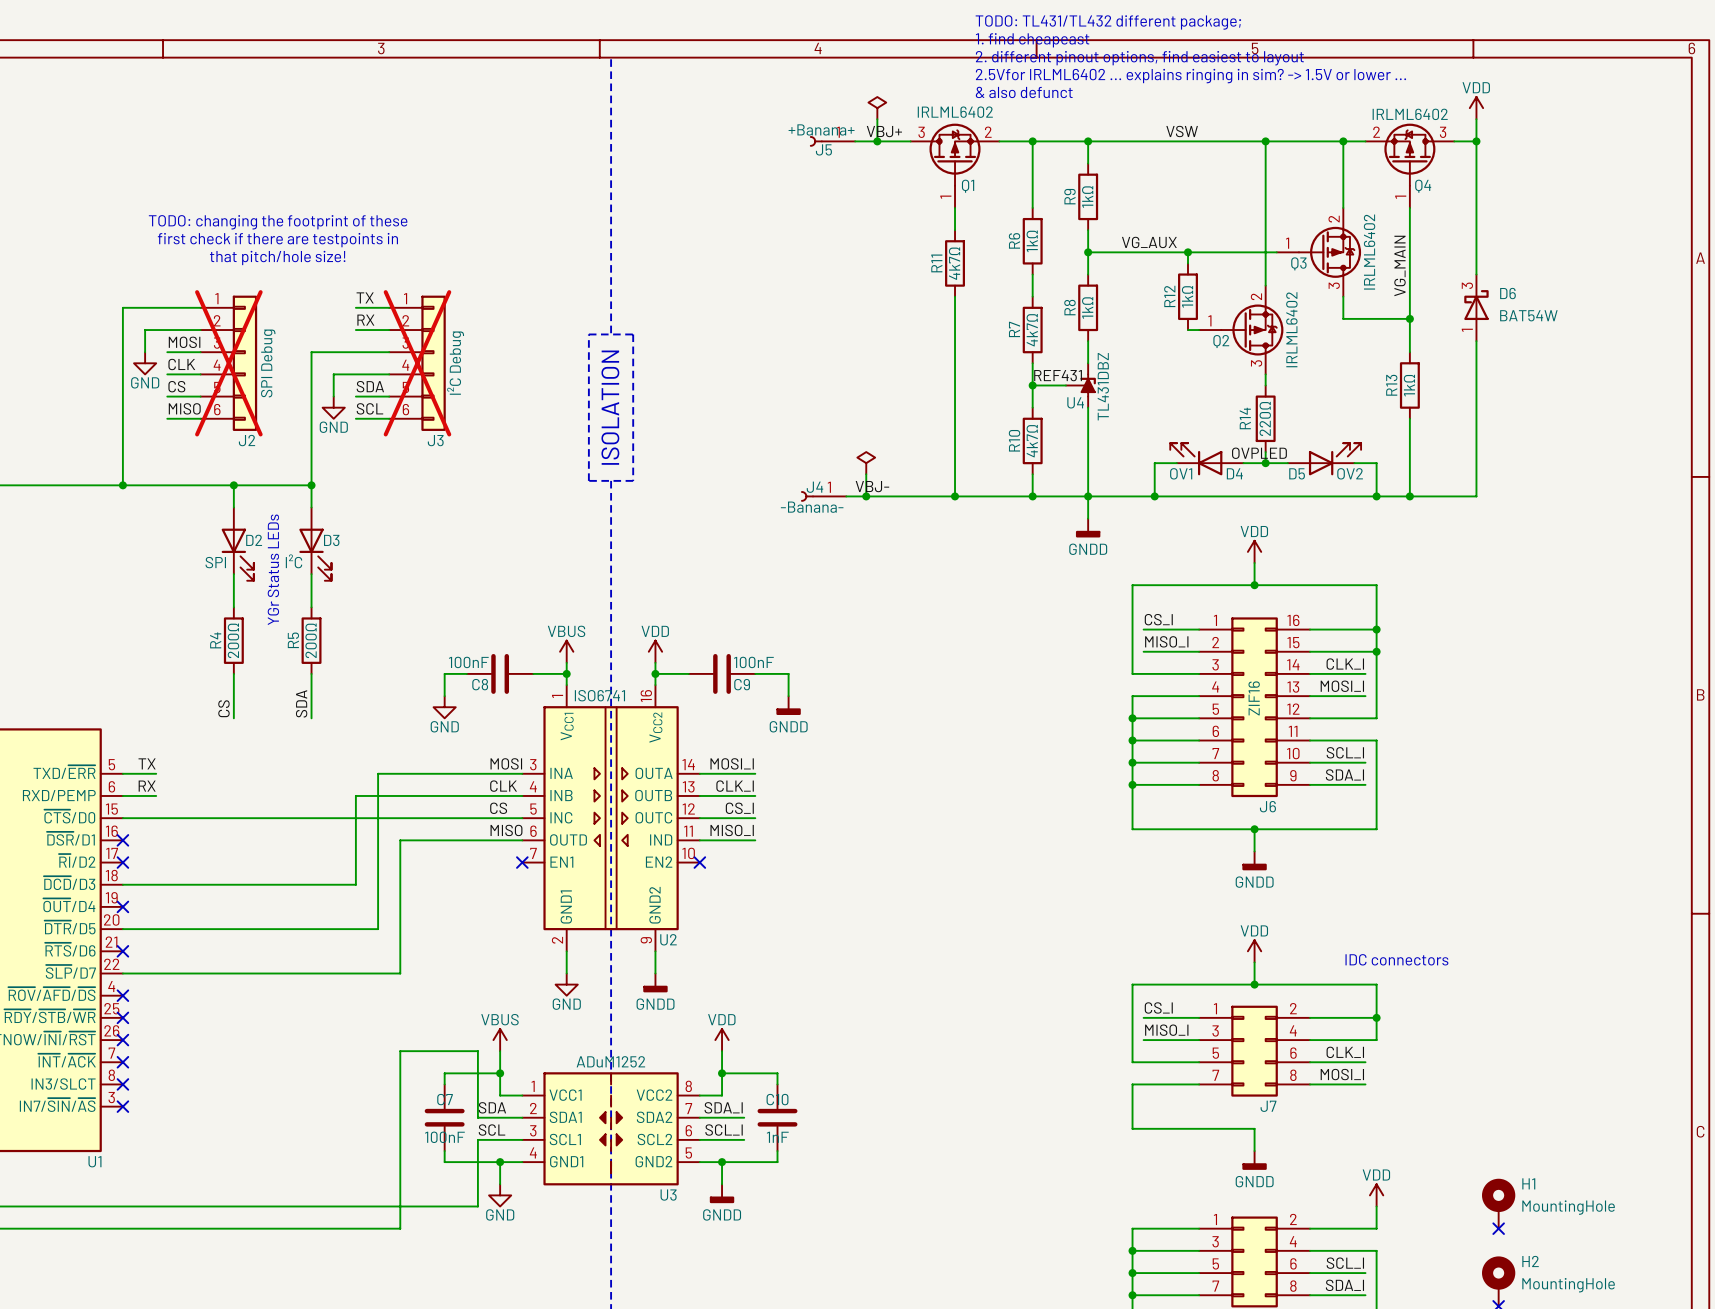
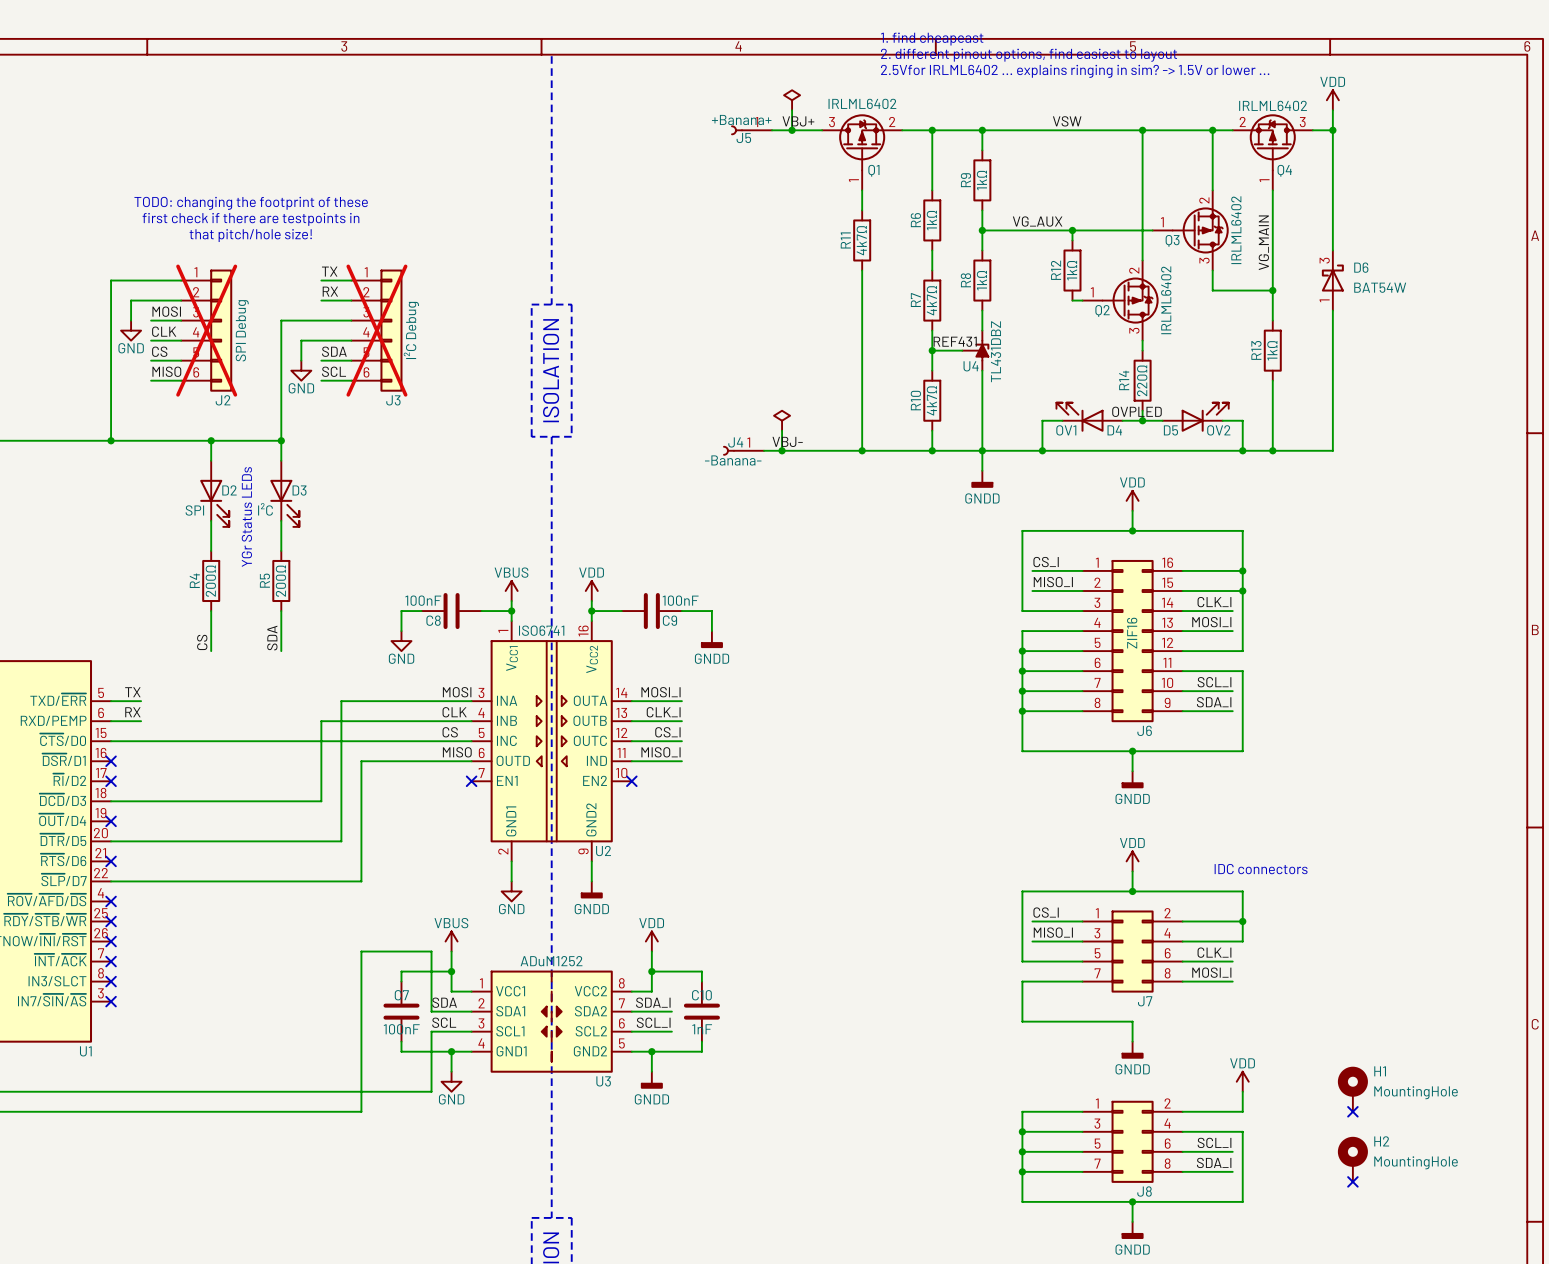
text: TODO: TL431/TL432 different package; (1108, 22) -> none
text: & also defunct (1024, 92) -> none

